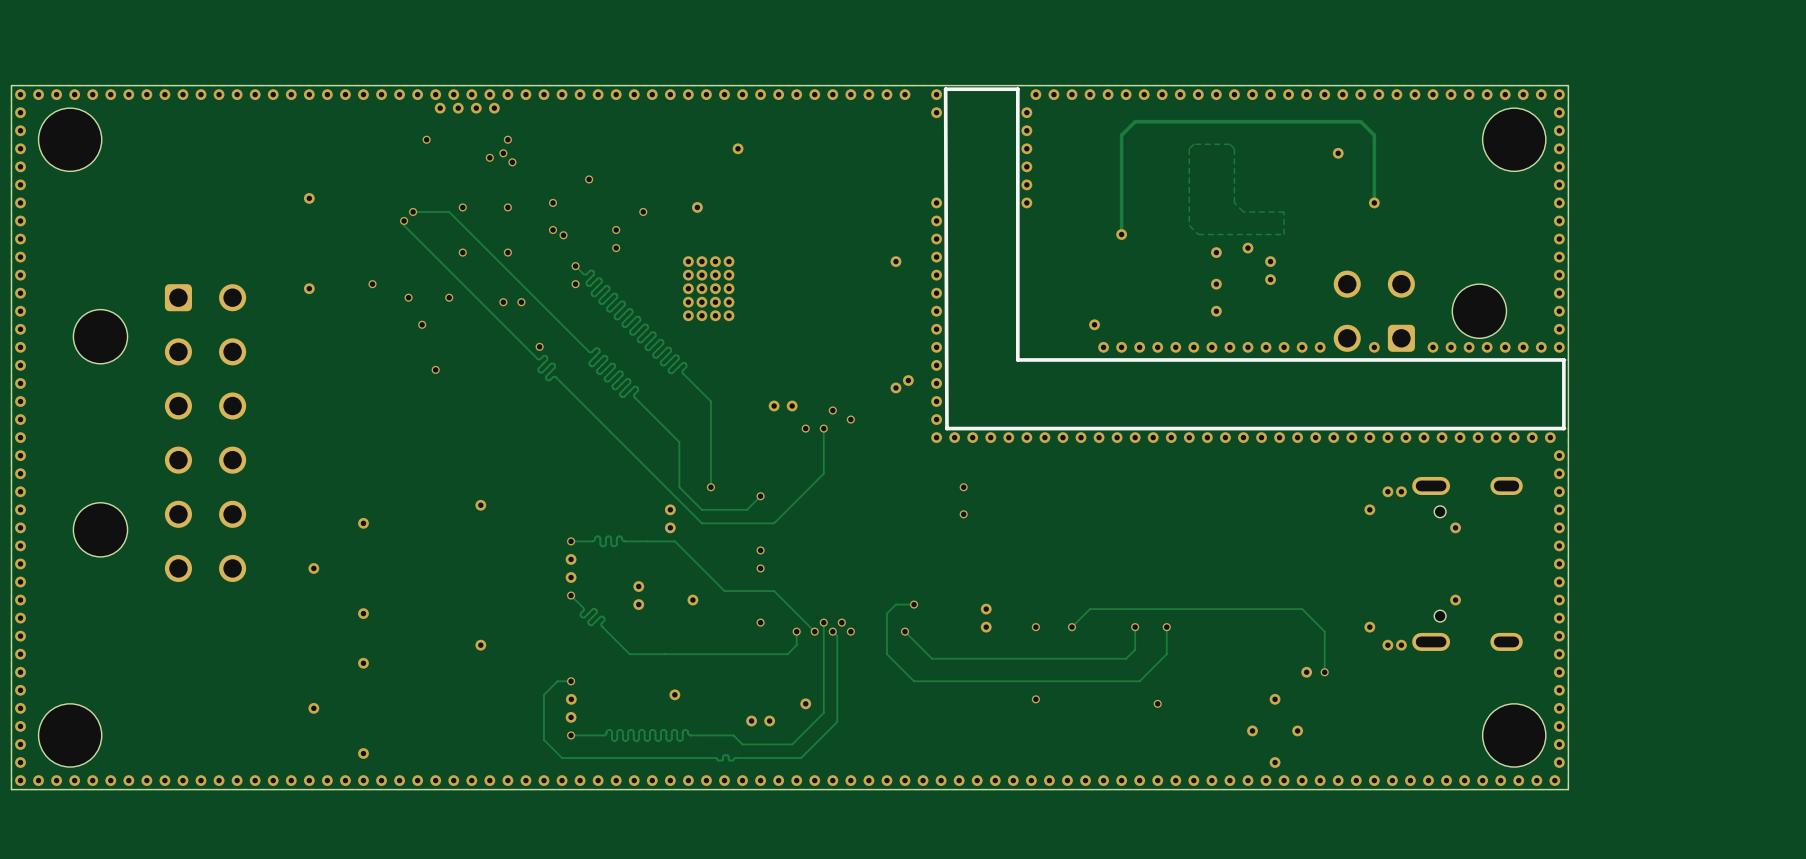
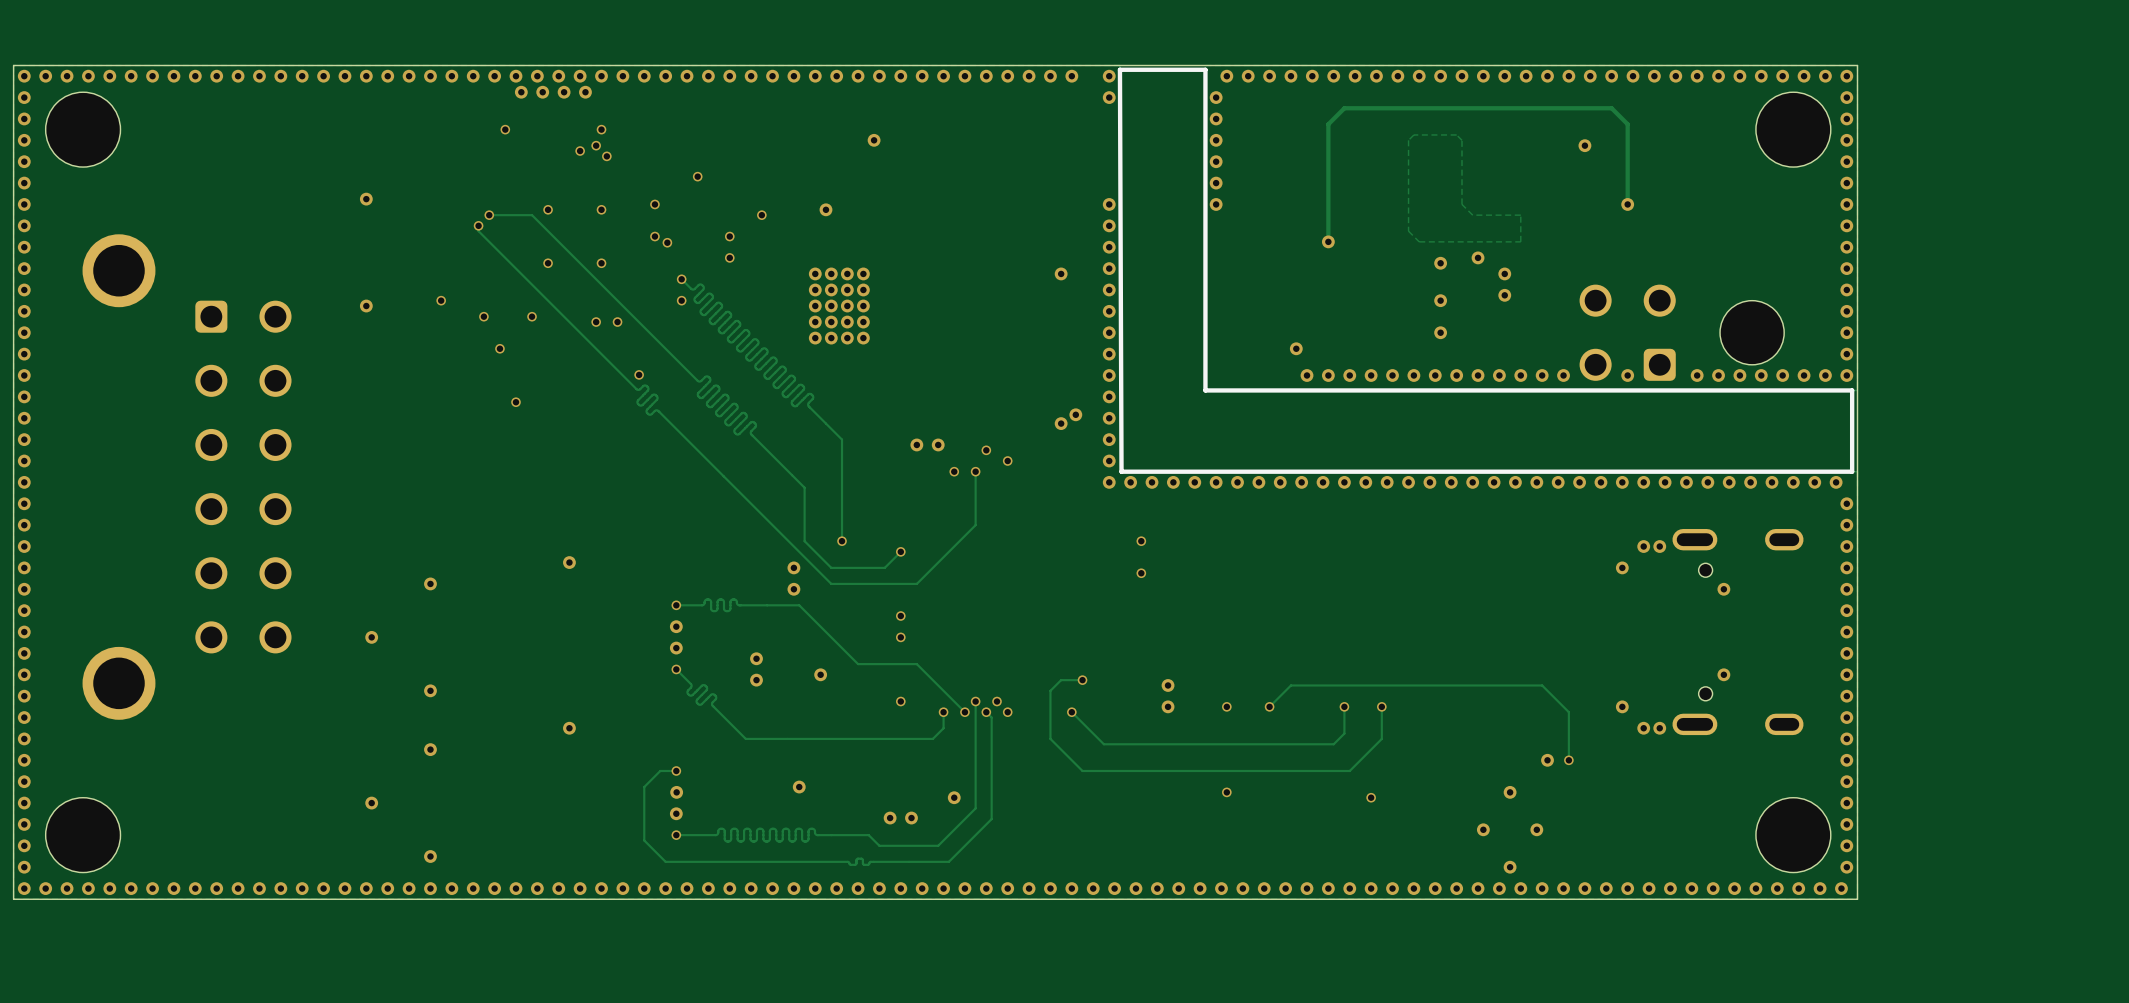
part footprint: [73, 284, 247, 583] -> [82, 234, 292, 720]

